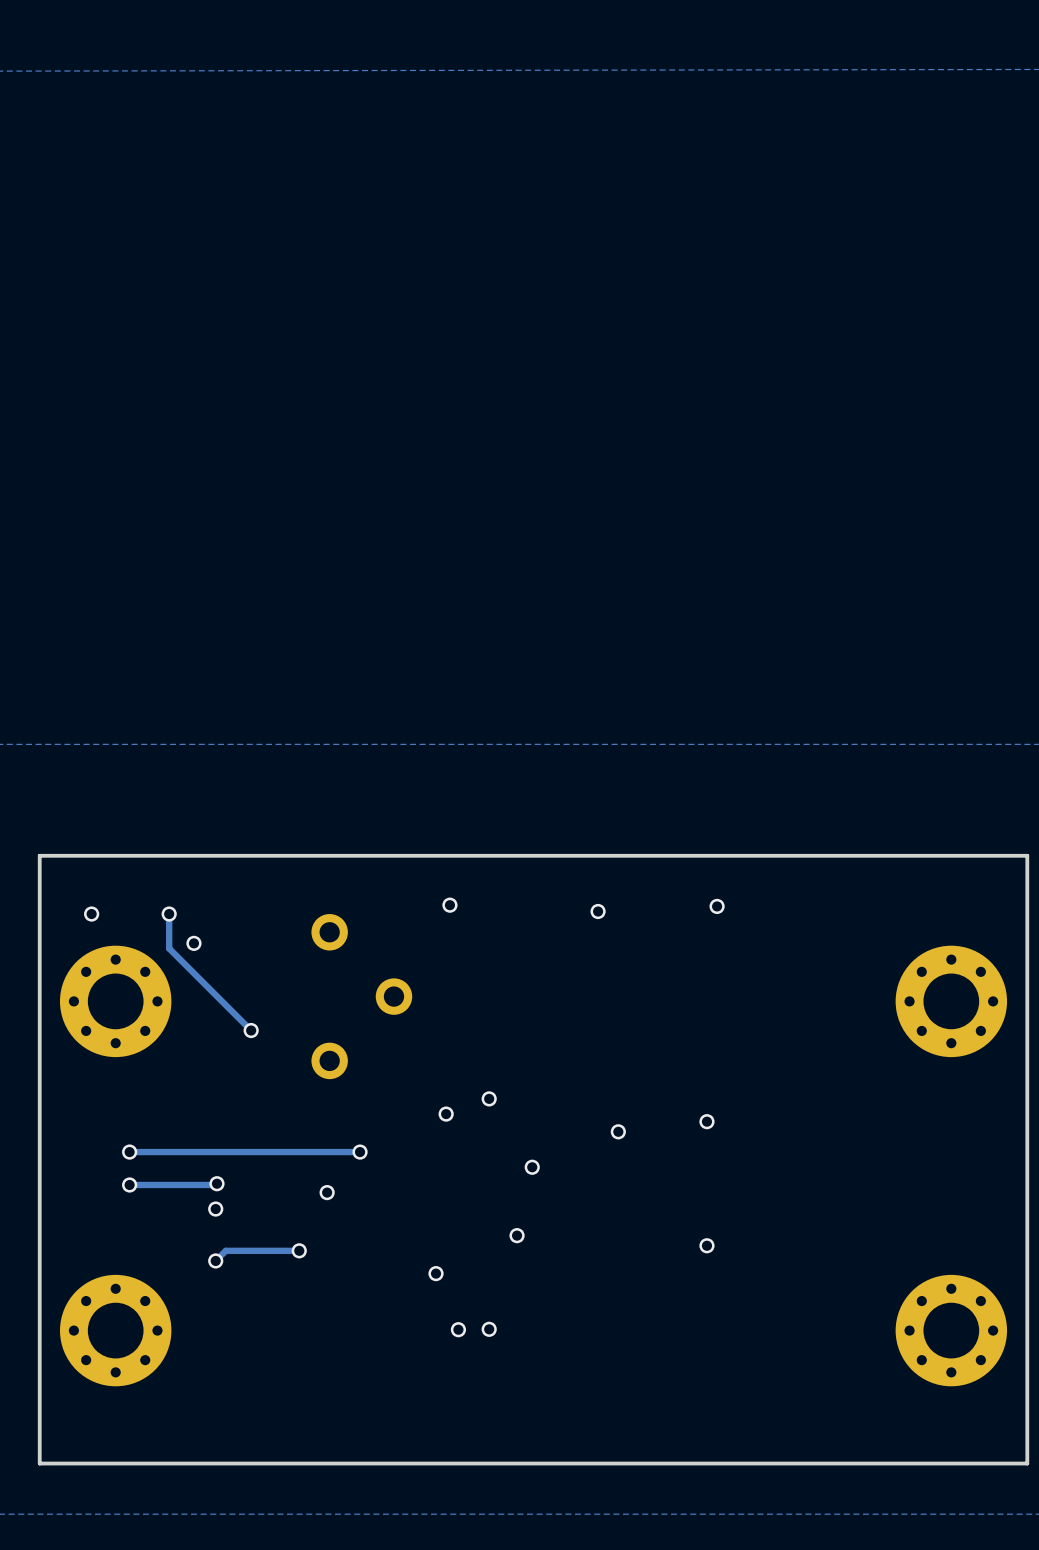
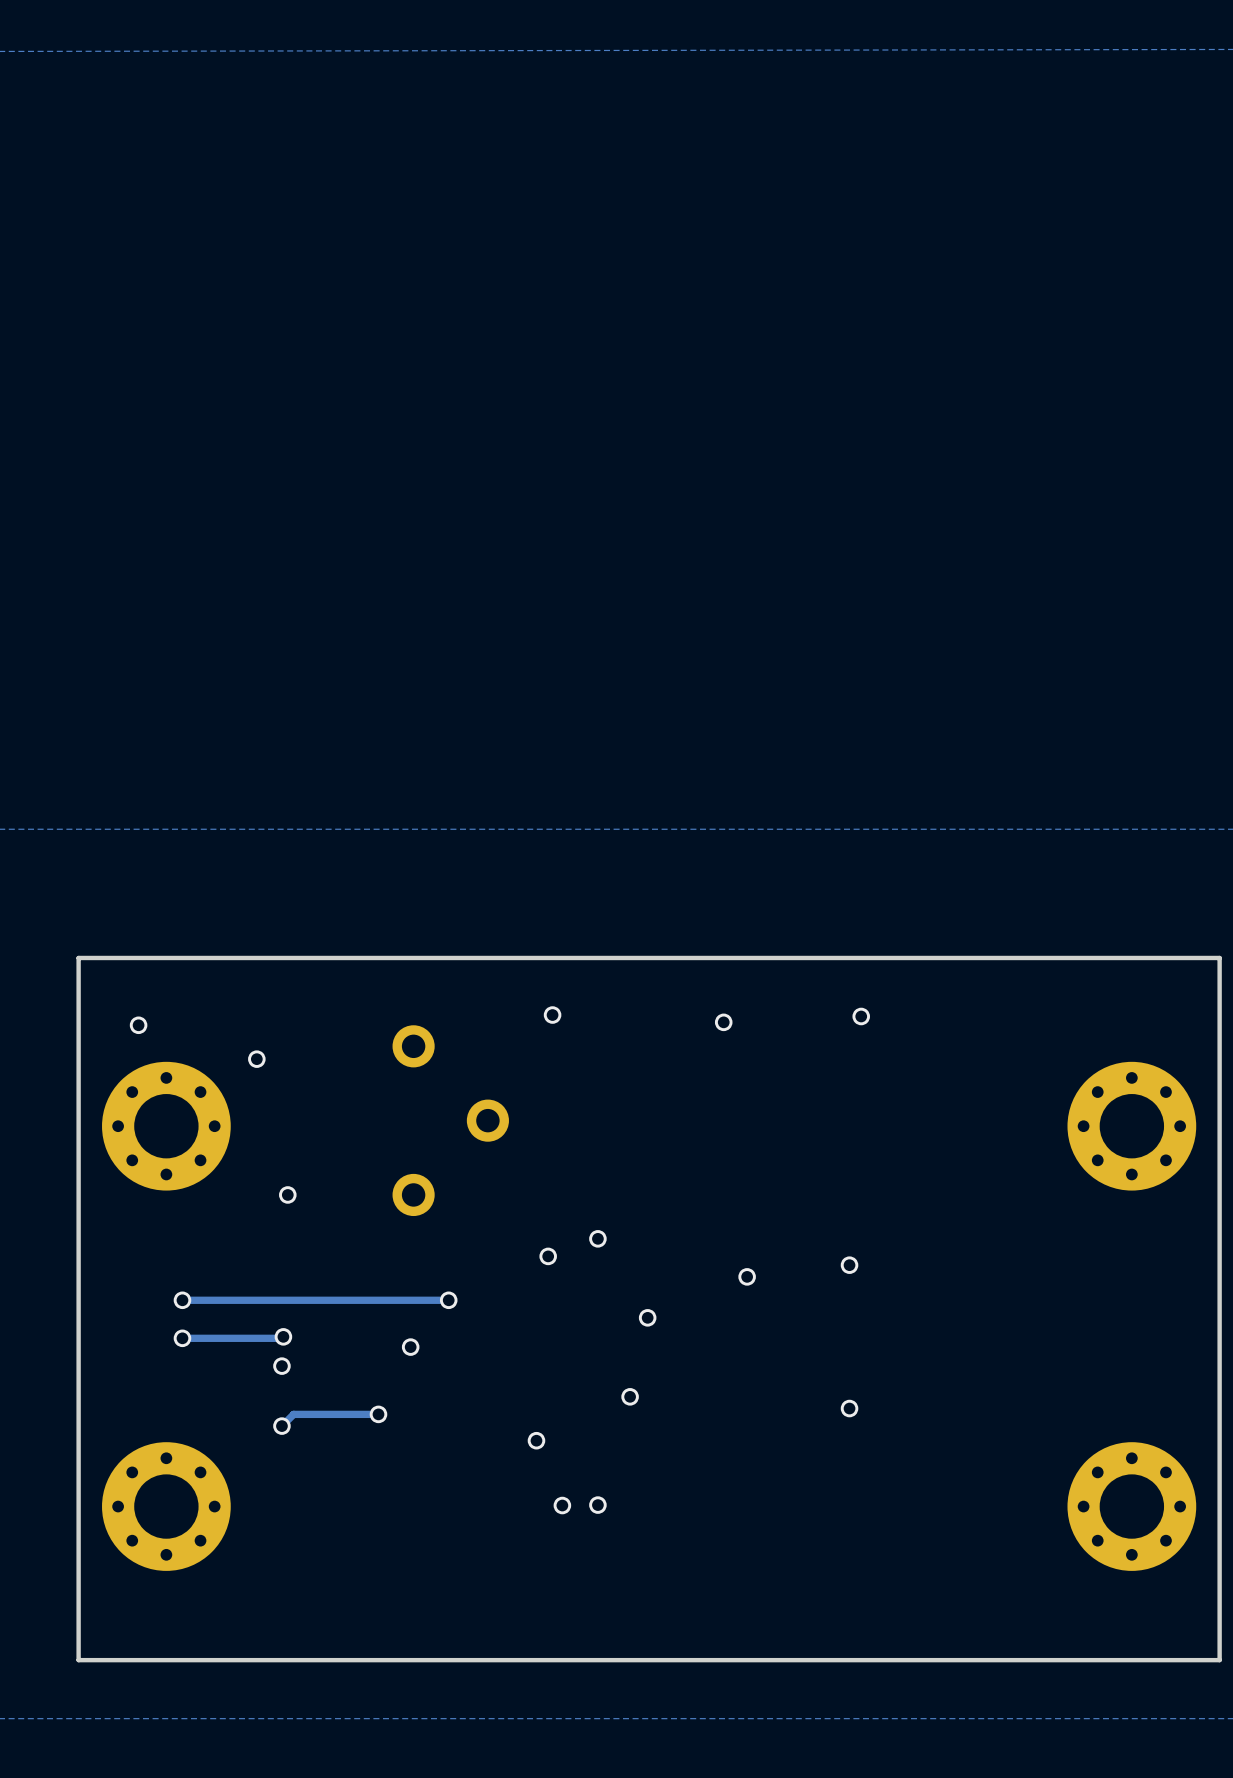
track: (169, 914) (169, 948) (251, 1030) -> none
via: (169, 914) -> none
via position: (251, 1030) -> (287, 1194)

